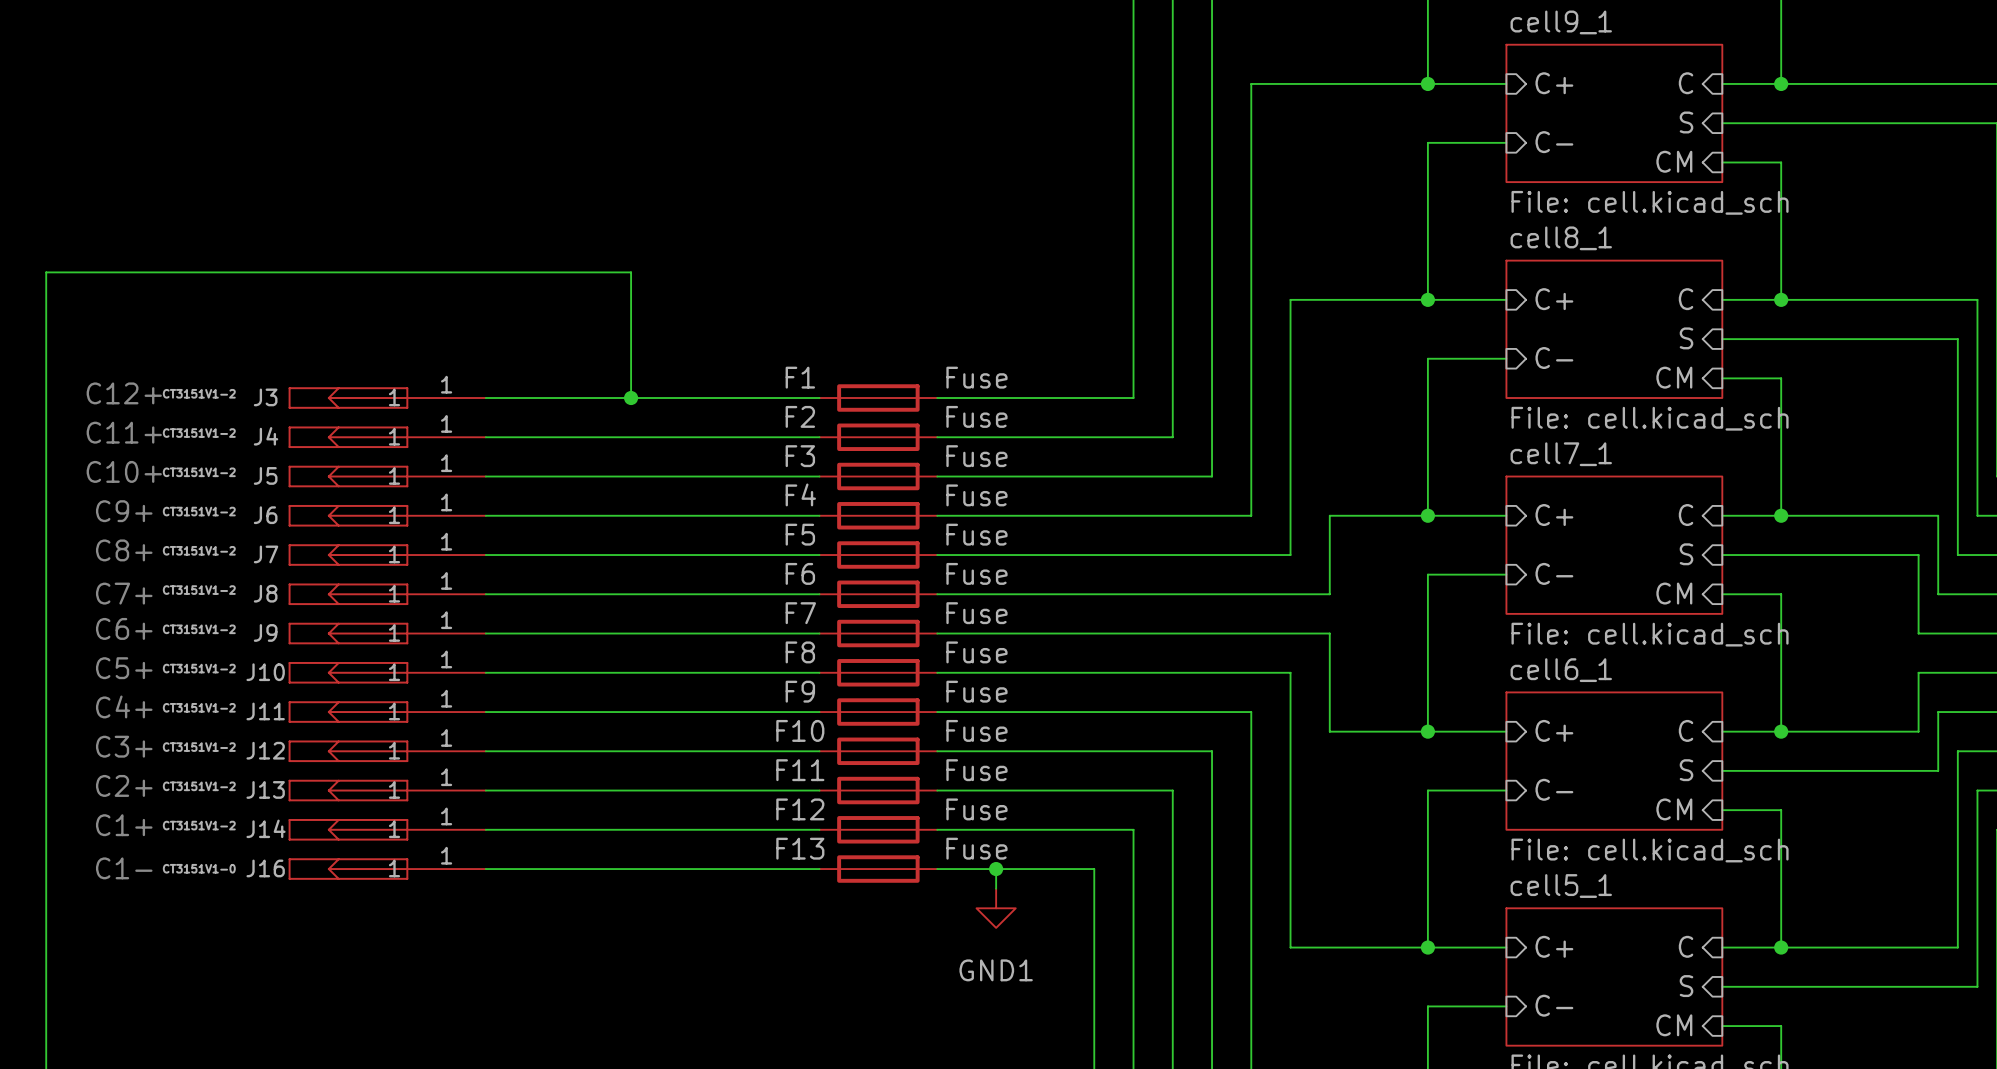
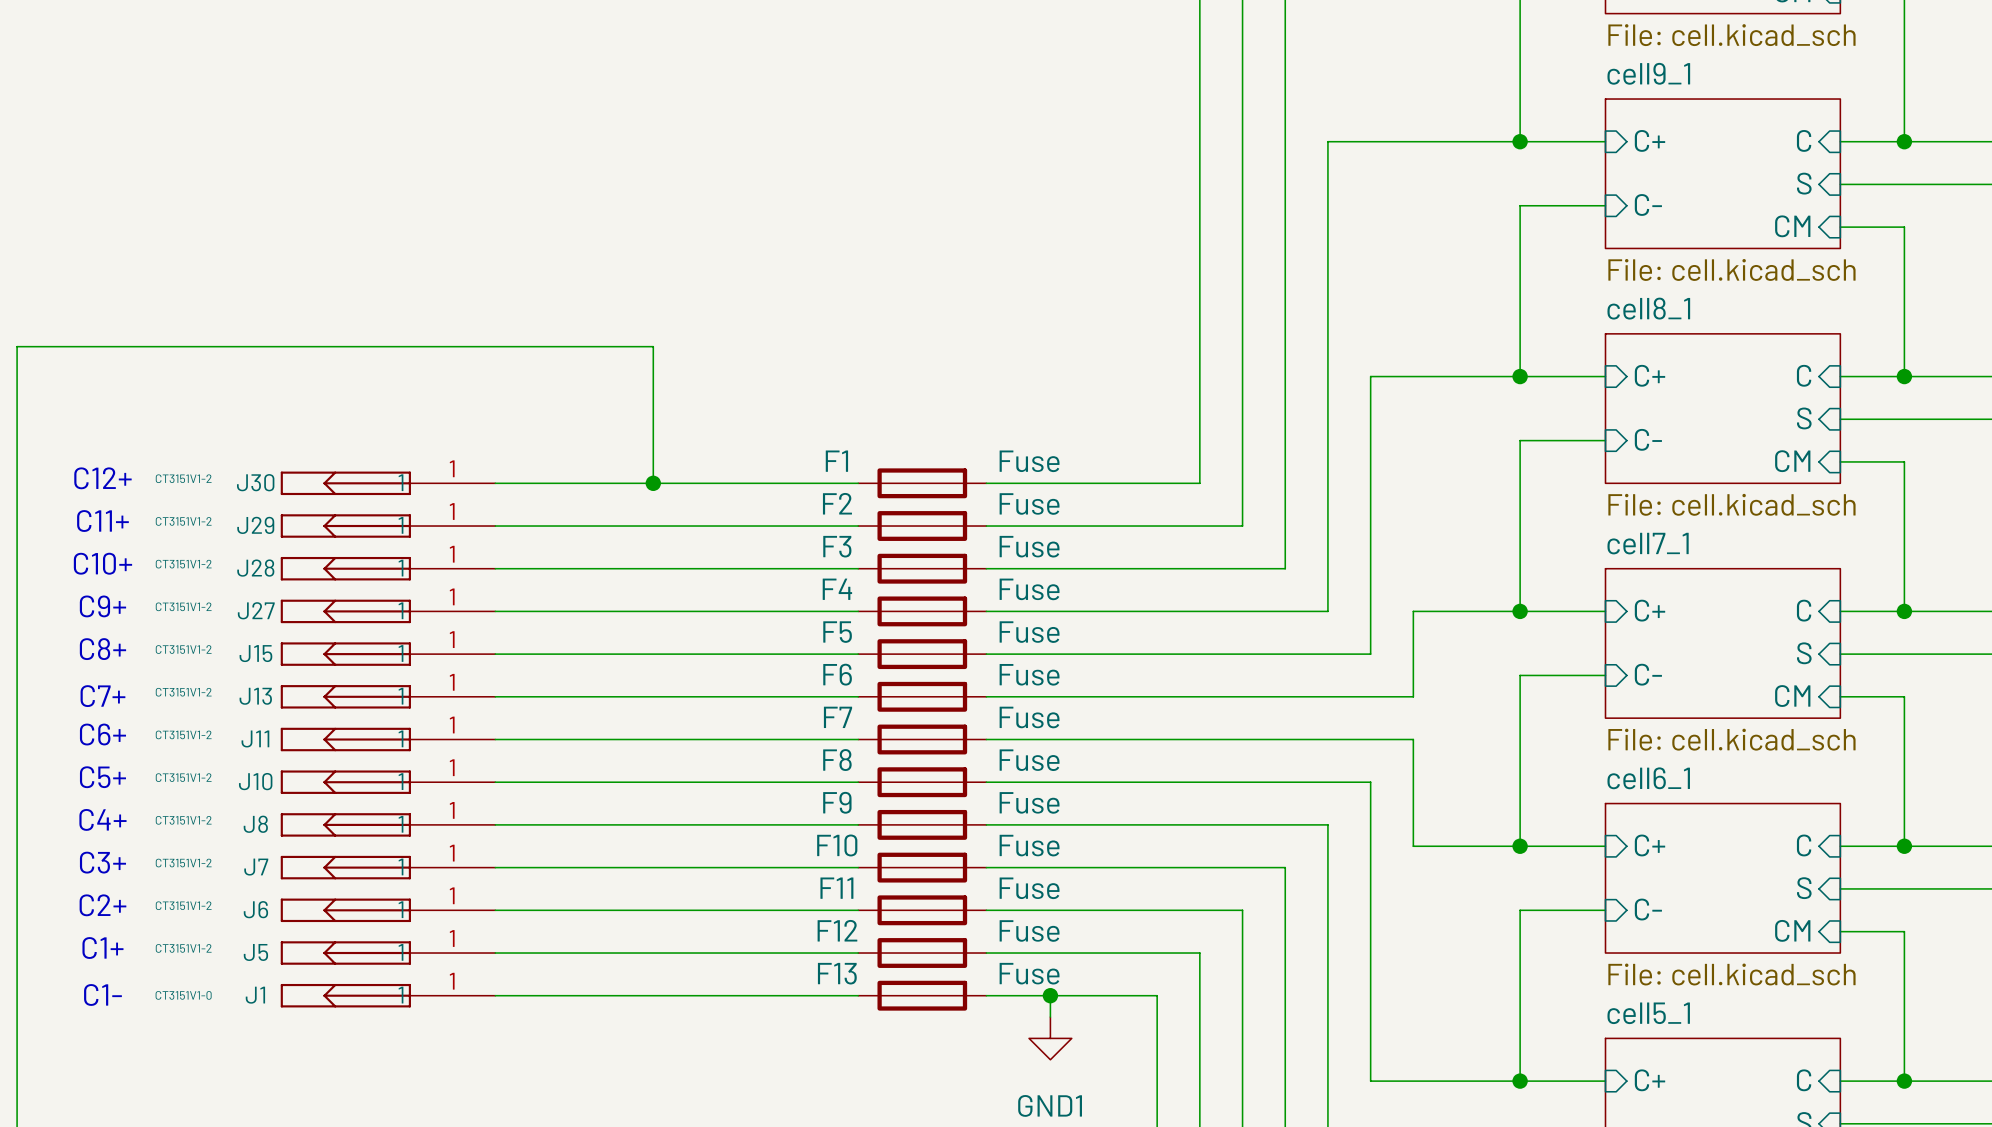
J3 name: J3 (265, 397) -> J30 (255, 482)
J4 name: J4 (266, 436) -> J29 (255, 525)
J5 name: J5 (265, 475) -> J28 (255, 568)
J6 name: J6 (265, 515) -> J27 (256, 610)
J7 name: J7 (266, 554) -> J15 (255, 653)
J8 name: J8 (265, 593) -> J13 (255, 696)
J9 name: J9 (265, 632) -> J11 (255, 738)
J11 name: J11 (265, 711) -> J8 (255, 824)
J12 name: J12 (265, 750) -> J7 (256, 867)
J13 name: J13 (265, 789) -> J6 (255, 909)
J14 name: J14 (266, 828) -> J5 (255, 952)
J16 name: J16 (265, 868) -> J1 (255, 995)

